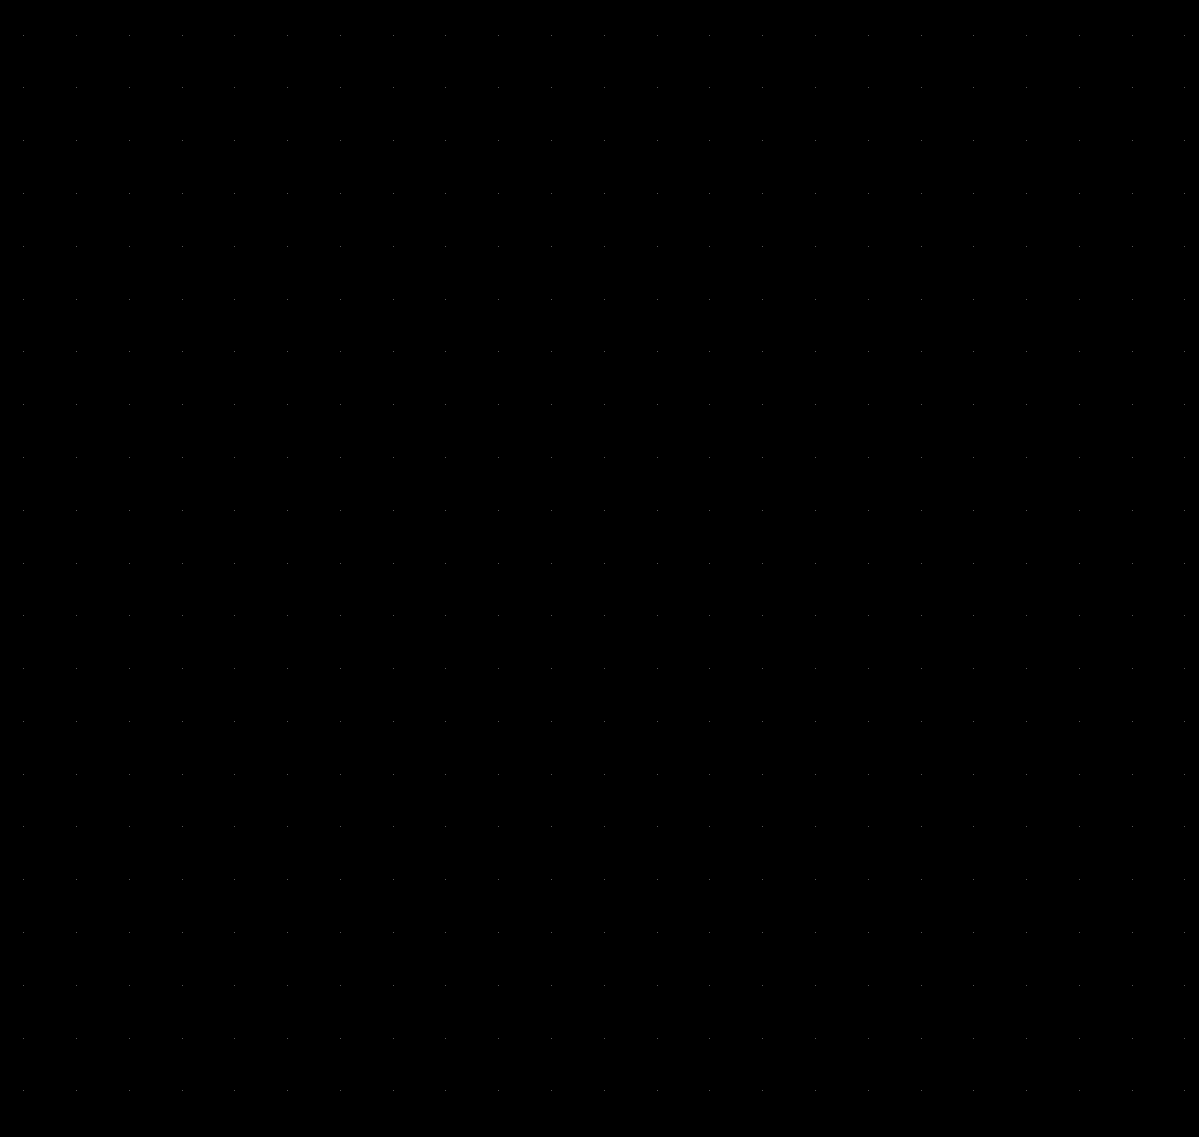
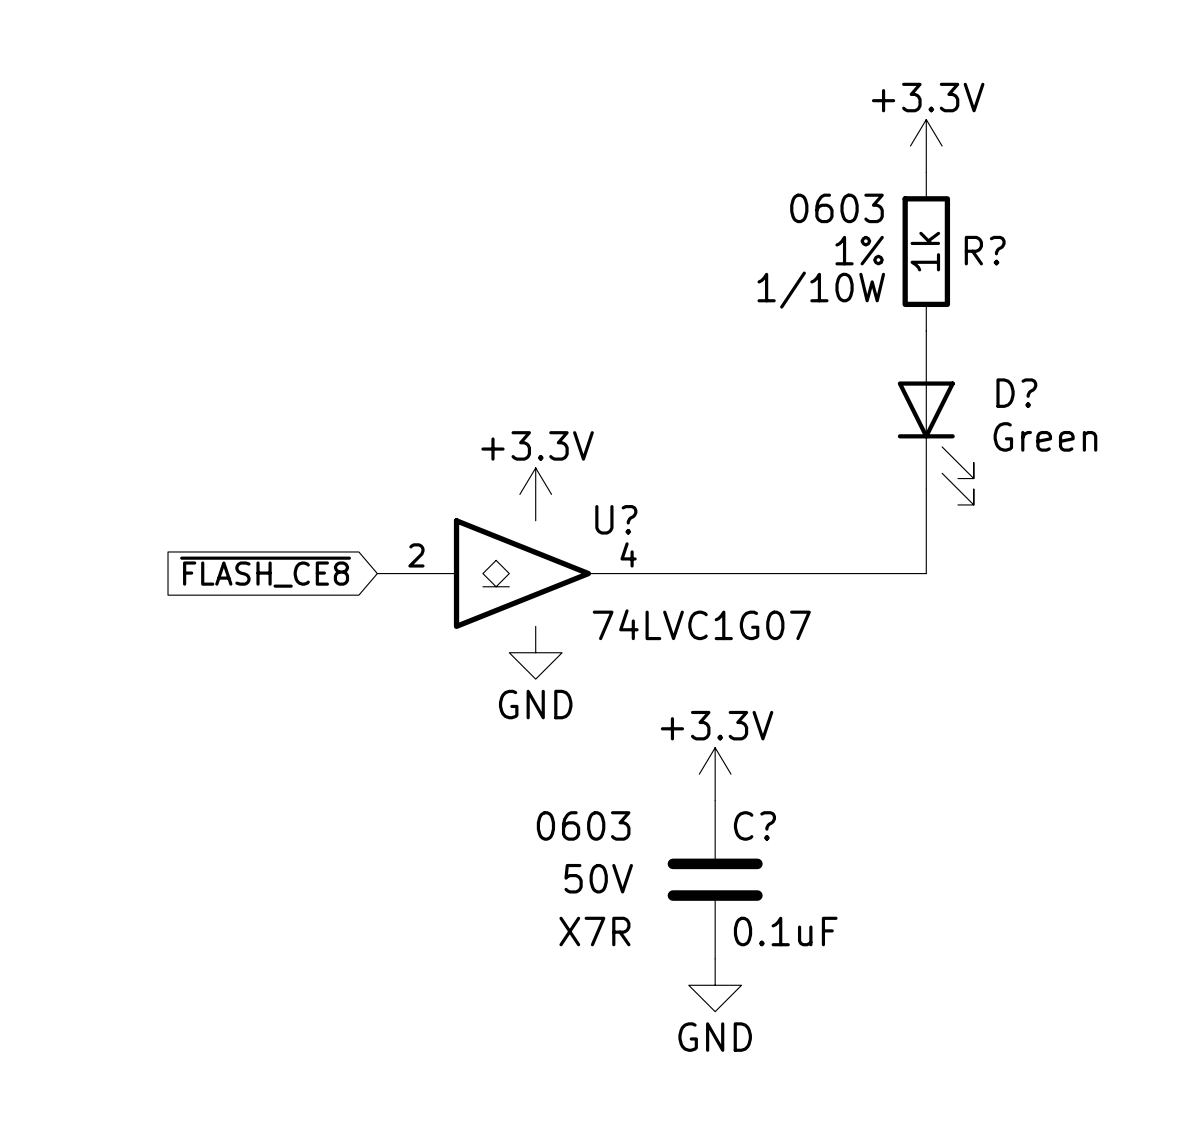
power symbol: none -> +3.3V (926, 146)
R?: none -> 1k (926, 251)
D?: none -> Green (935, 417)
wire: none -> (926, 489) (926, 573) (667, 573)
power symbol: none -> +3.3V (535, 494)
global label: none -> ~{FLASH_CE8} (265, 572)
U?: none -> 74LVC1G07 (522, 573)
power symbol: none -> GND (535, 652)
power symbol: none -> +3.3V (715, 774)
C?: none -> 0.1uF (715, 879)
power symbol: none -> GND (715, 985)

